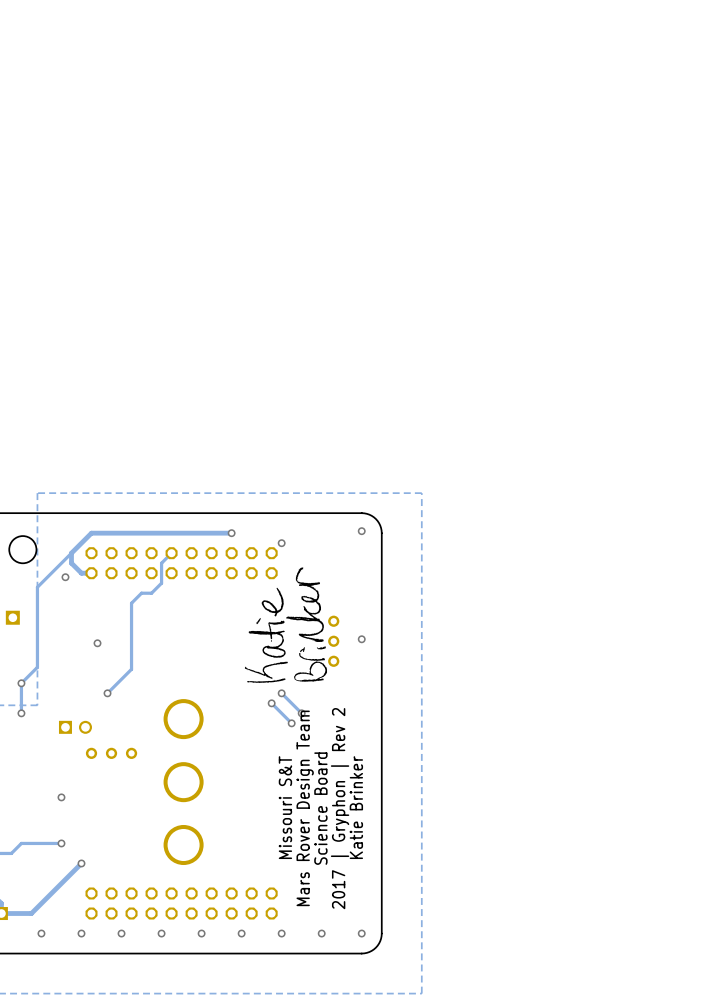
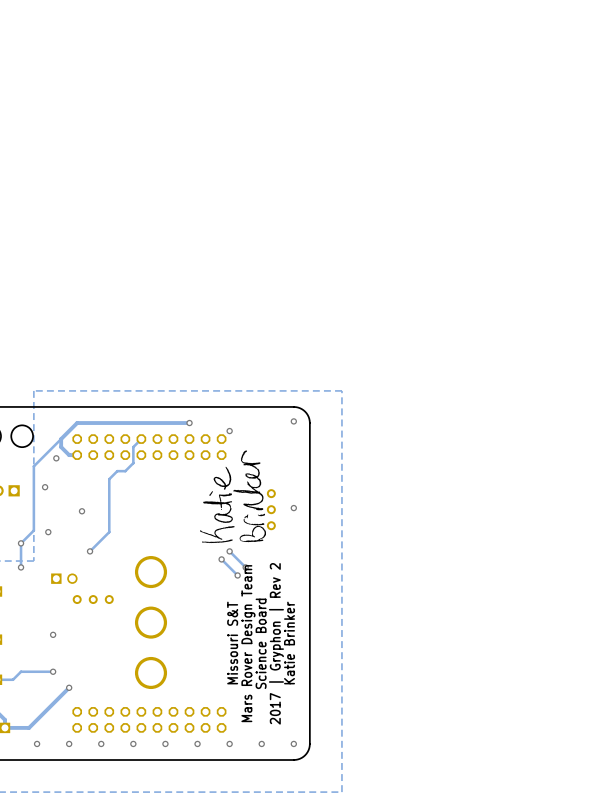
via: none -> (45, 487)
via: none -> (48, 532)

